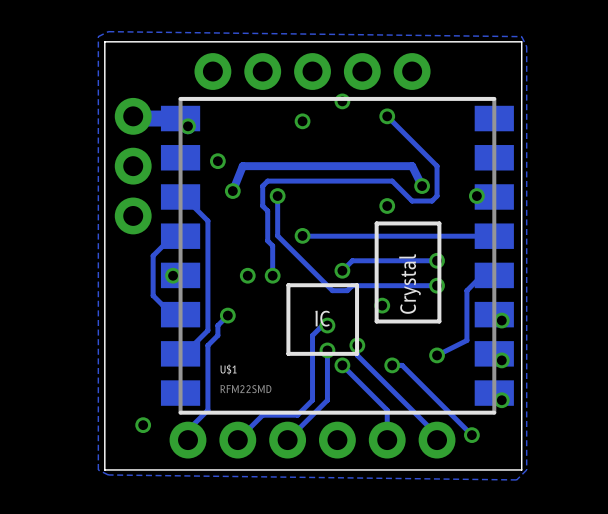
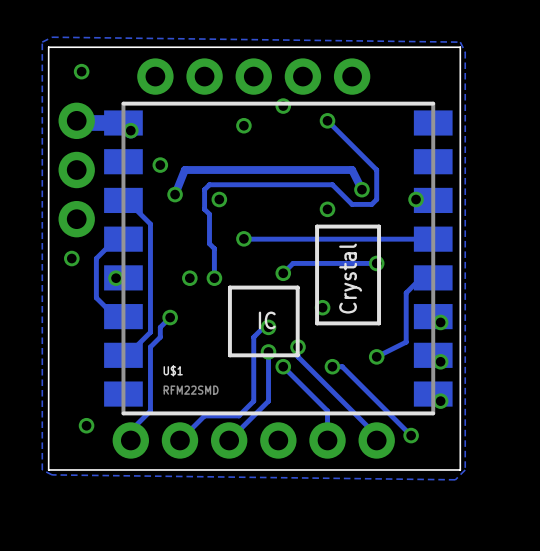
via: none -> (81, 71)
track: (277, 196) (277, 235) (332, 290) (347, 290) (352, 285) (437, 285) -> none
via: none -> (71, 258)
via: (437, 285) -> none

